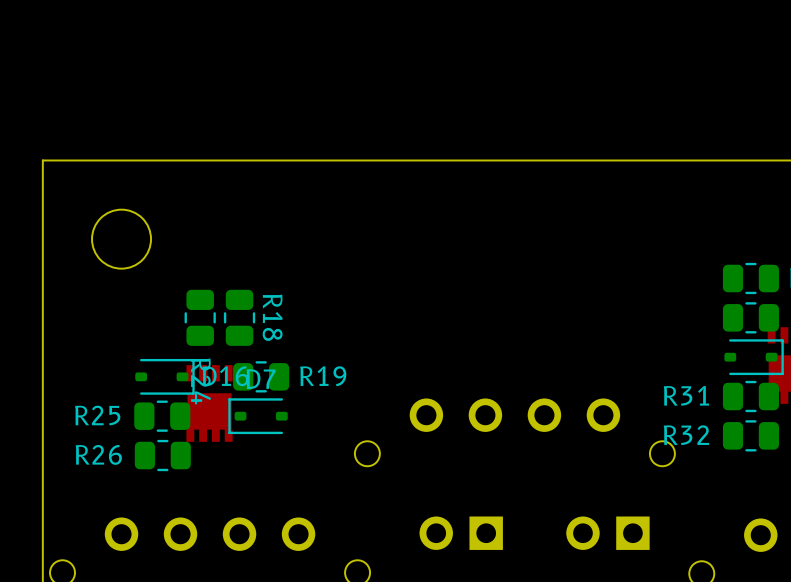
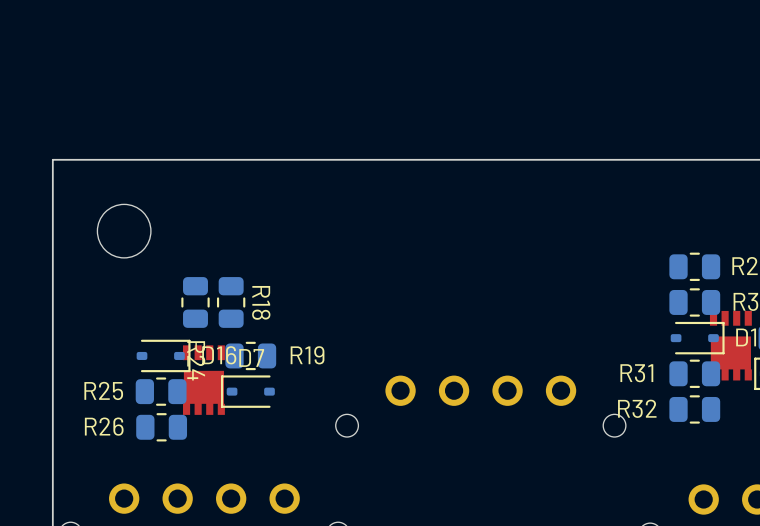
part: (461, 533) -> none
part: (607, 533) -> none

